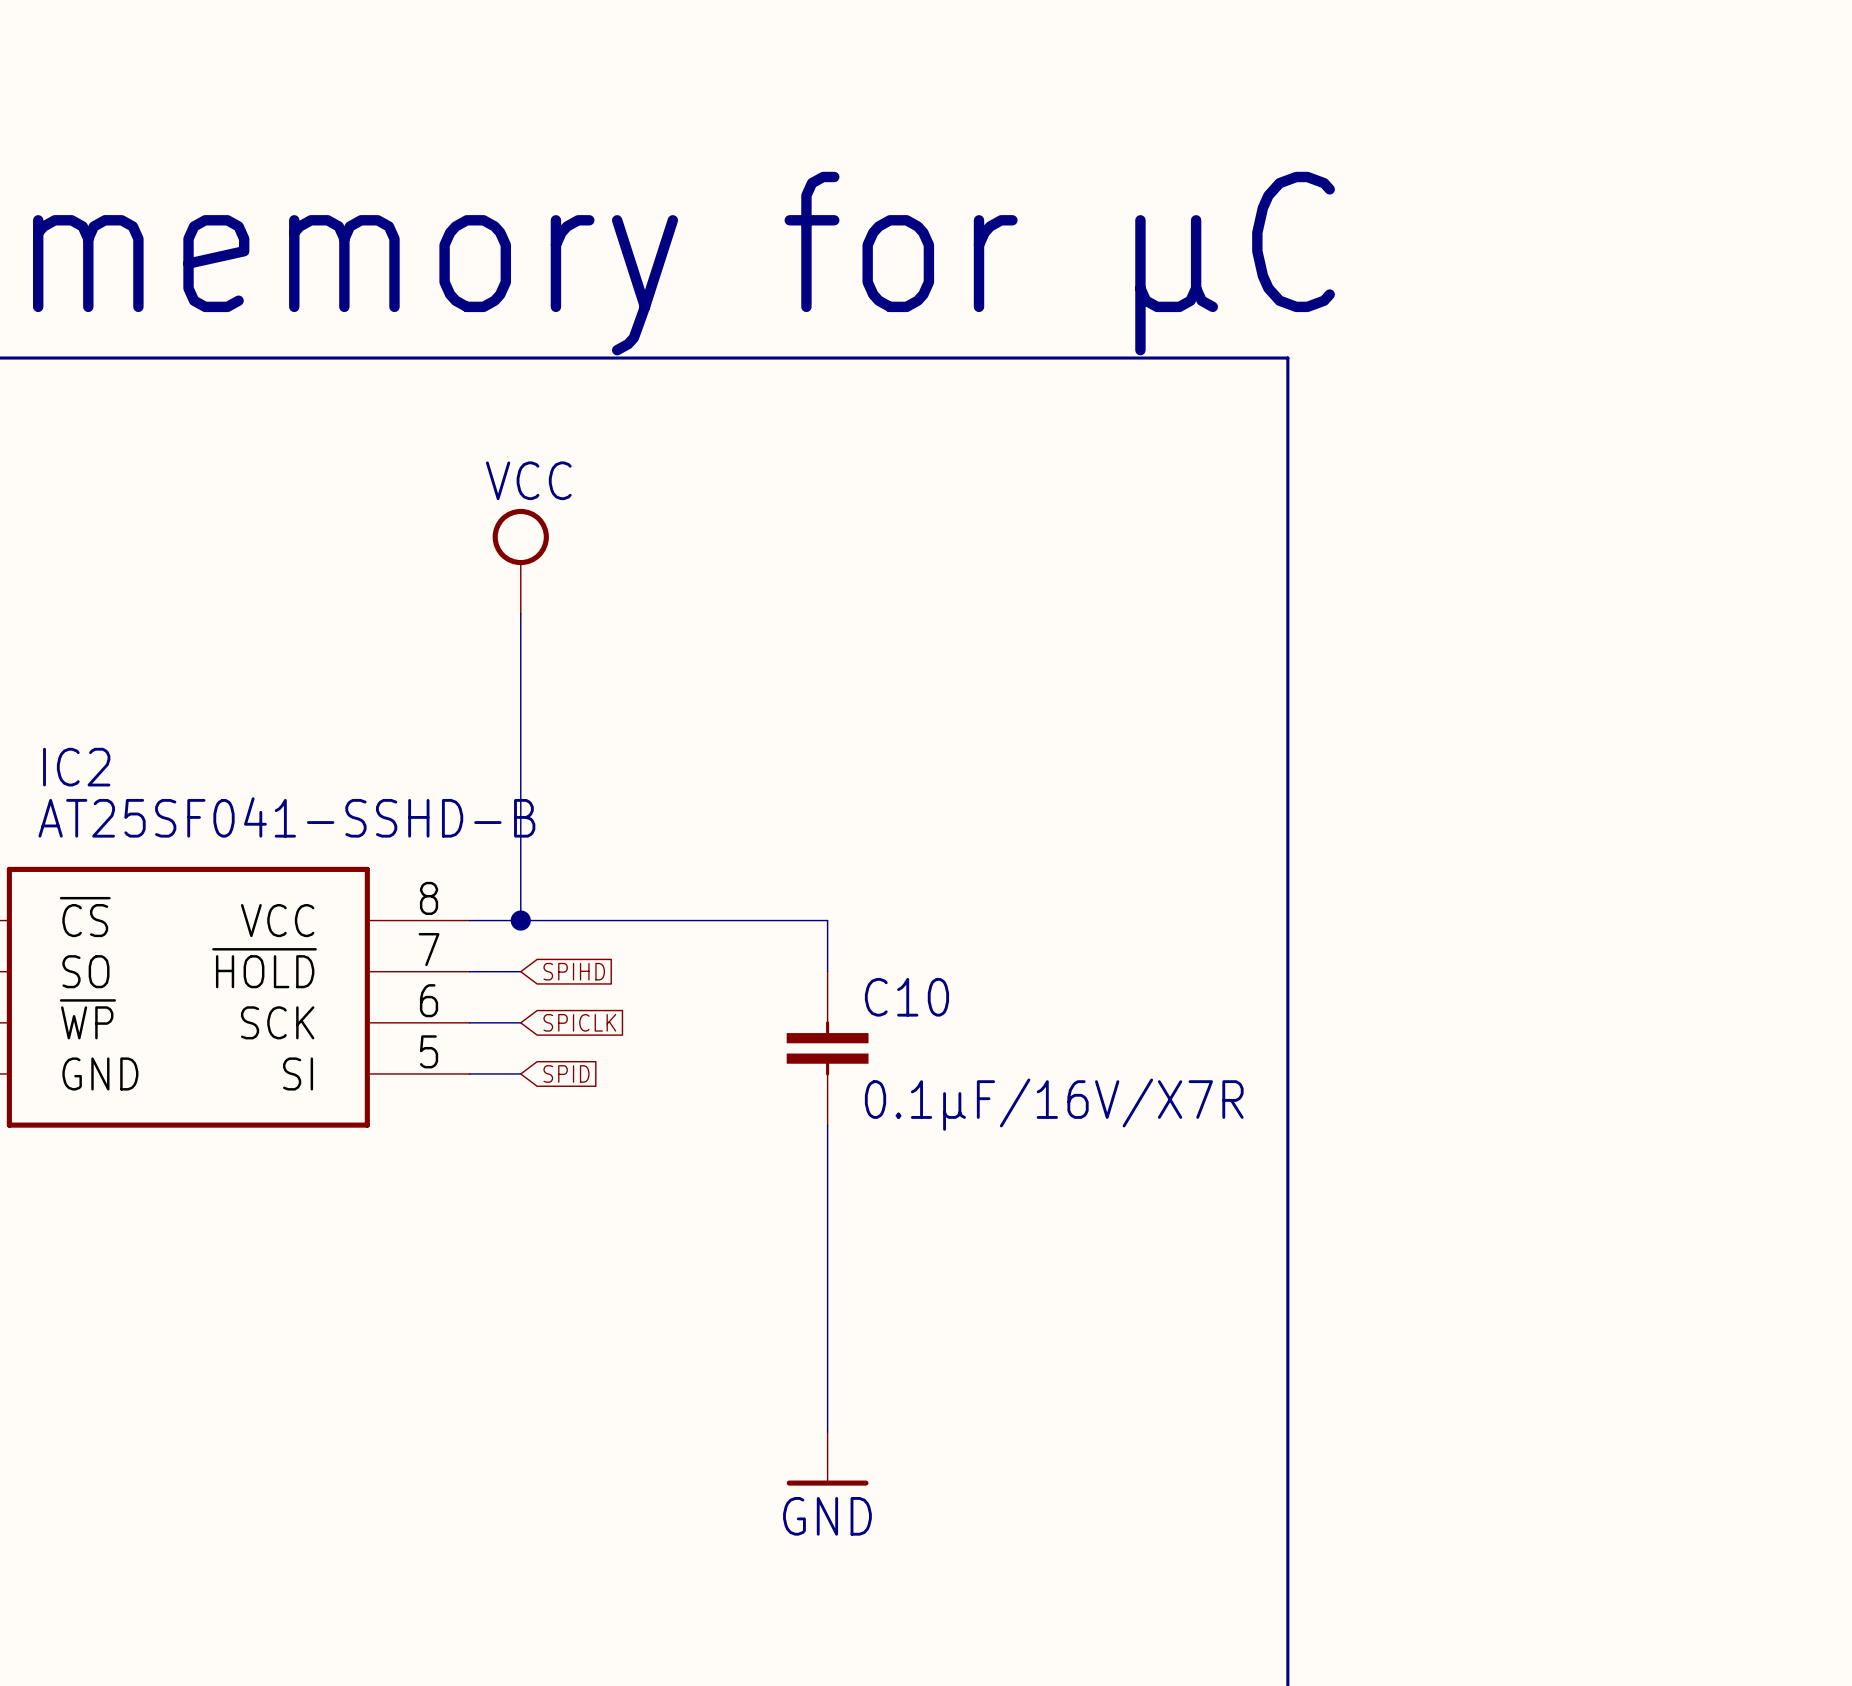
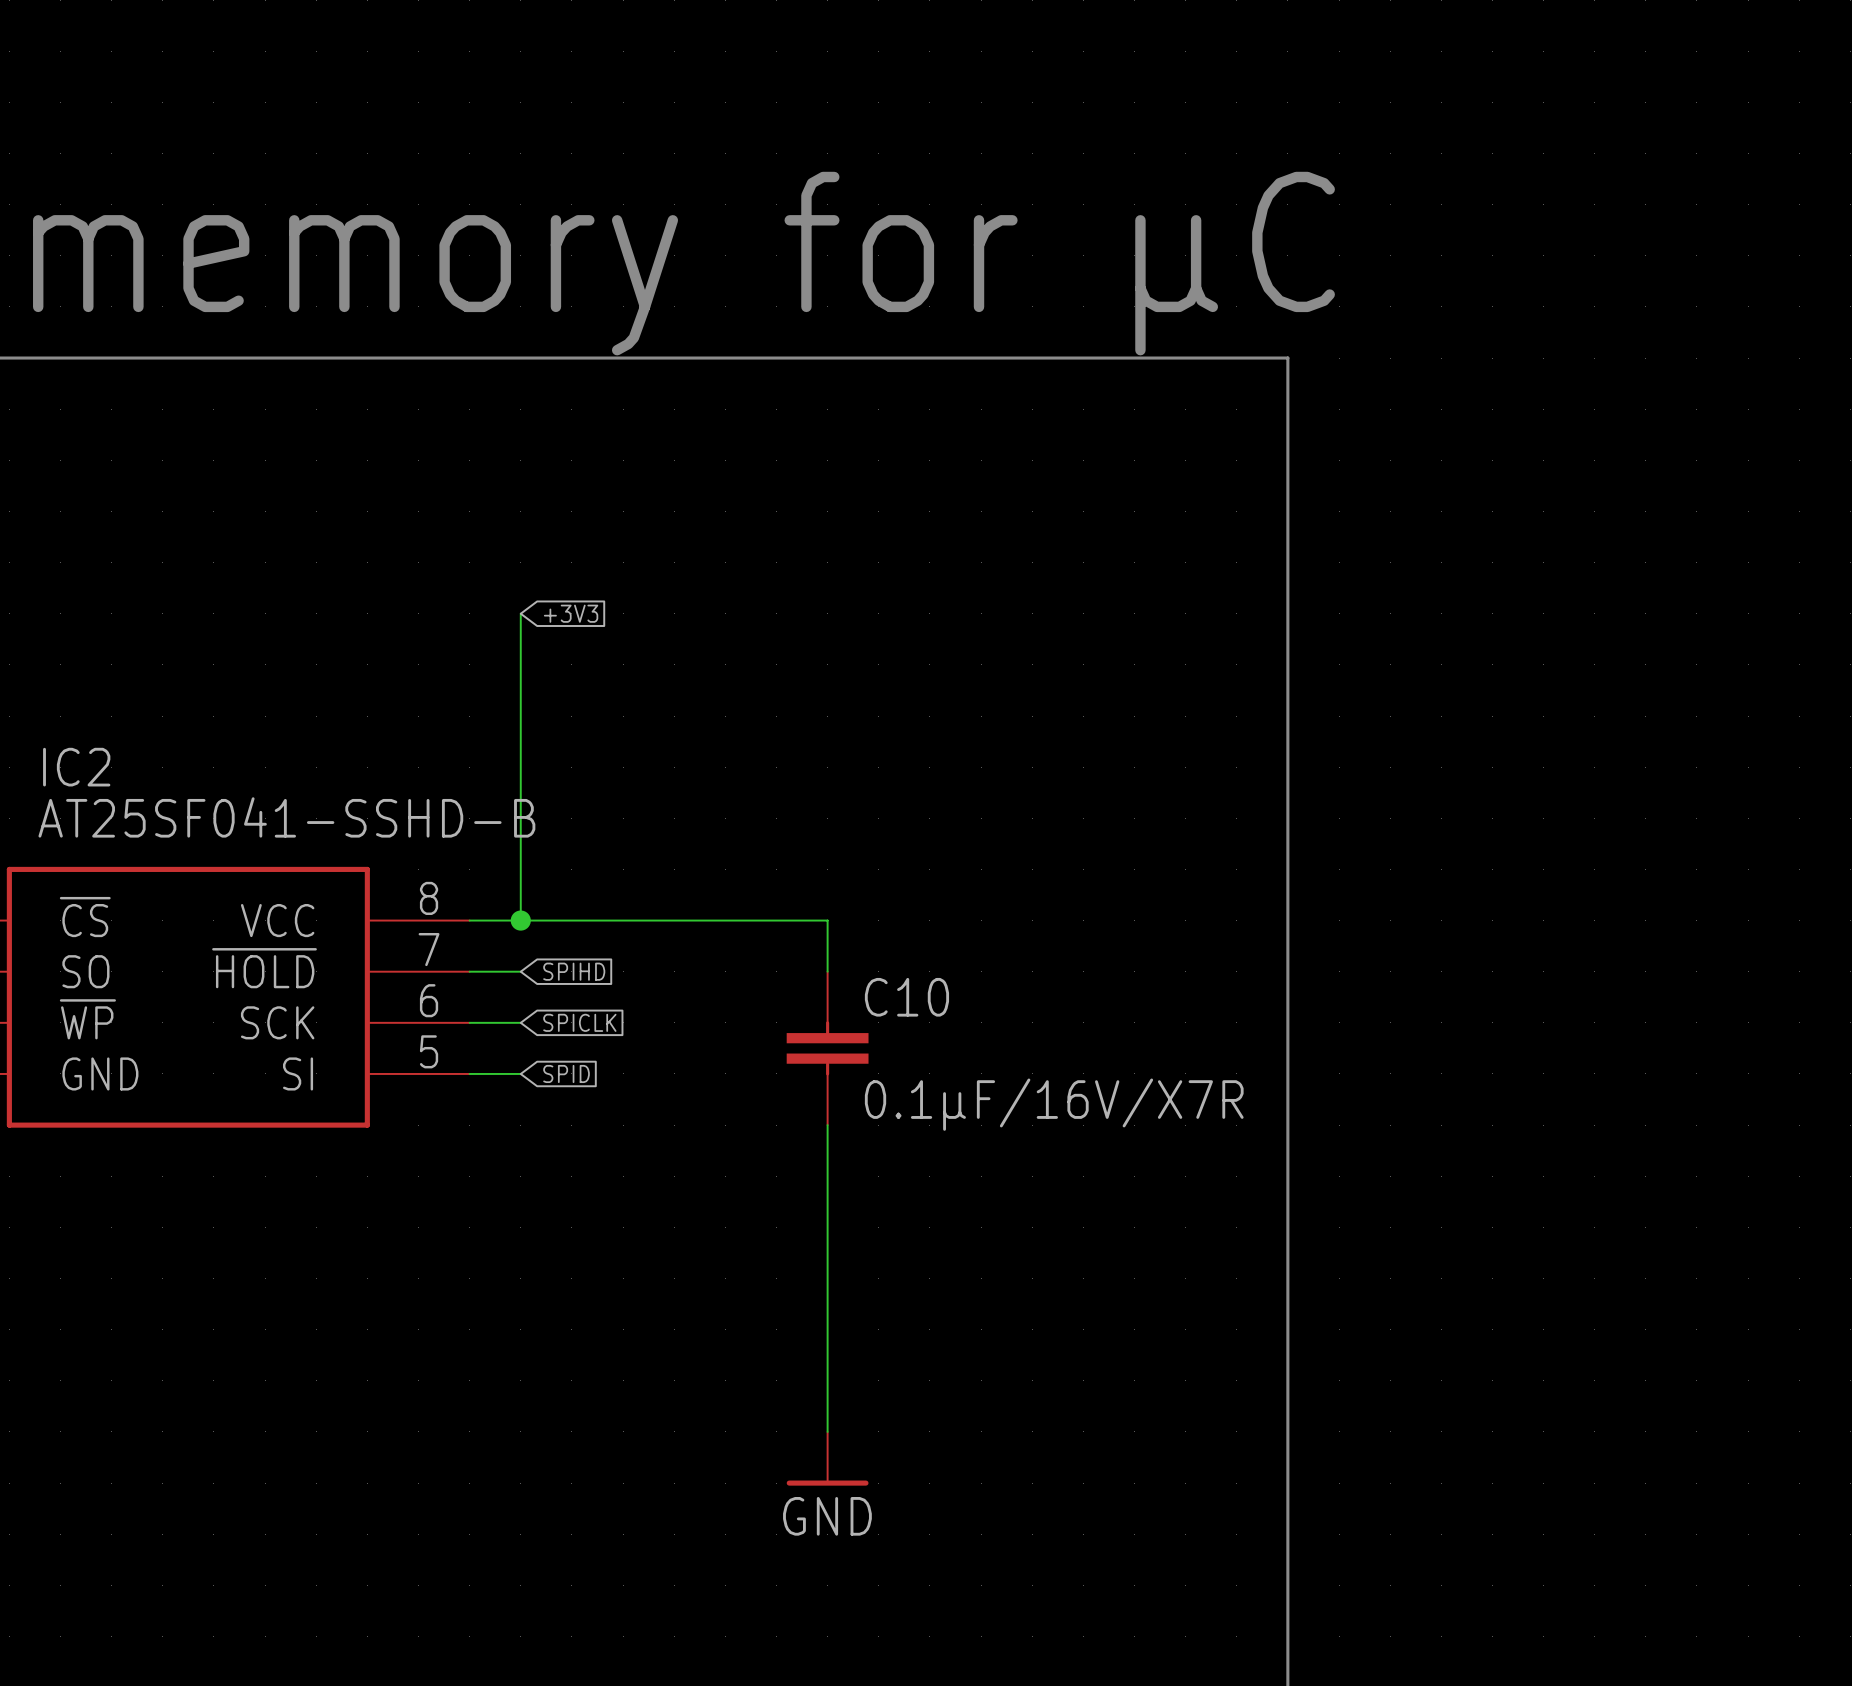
power symbol: VCC (520, 561) -> none
global label: none -> +3V3 (571, 613)

